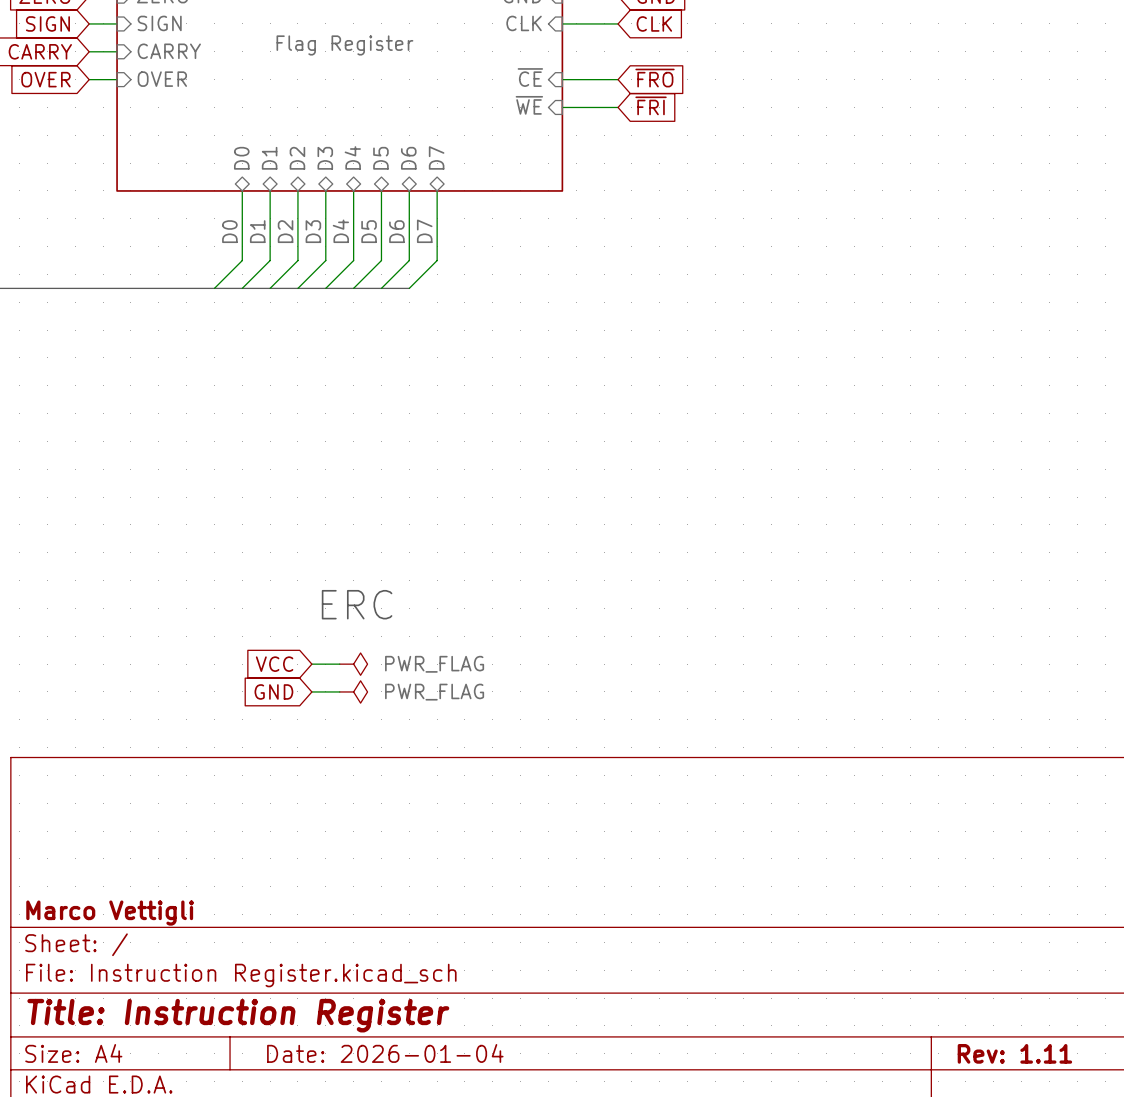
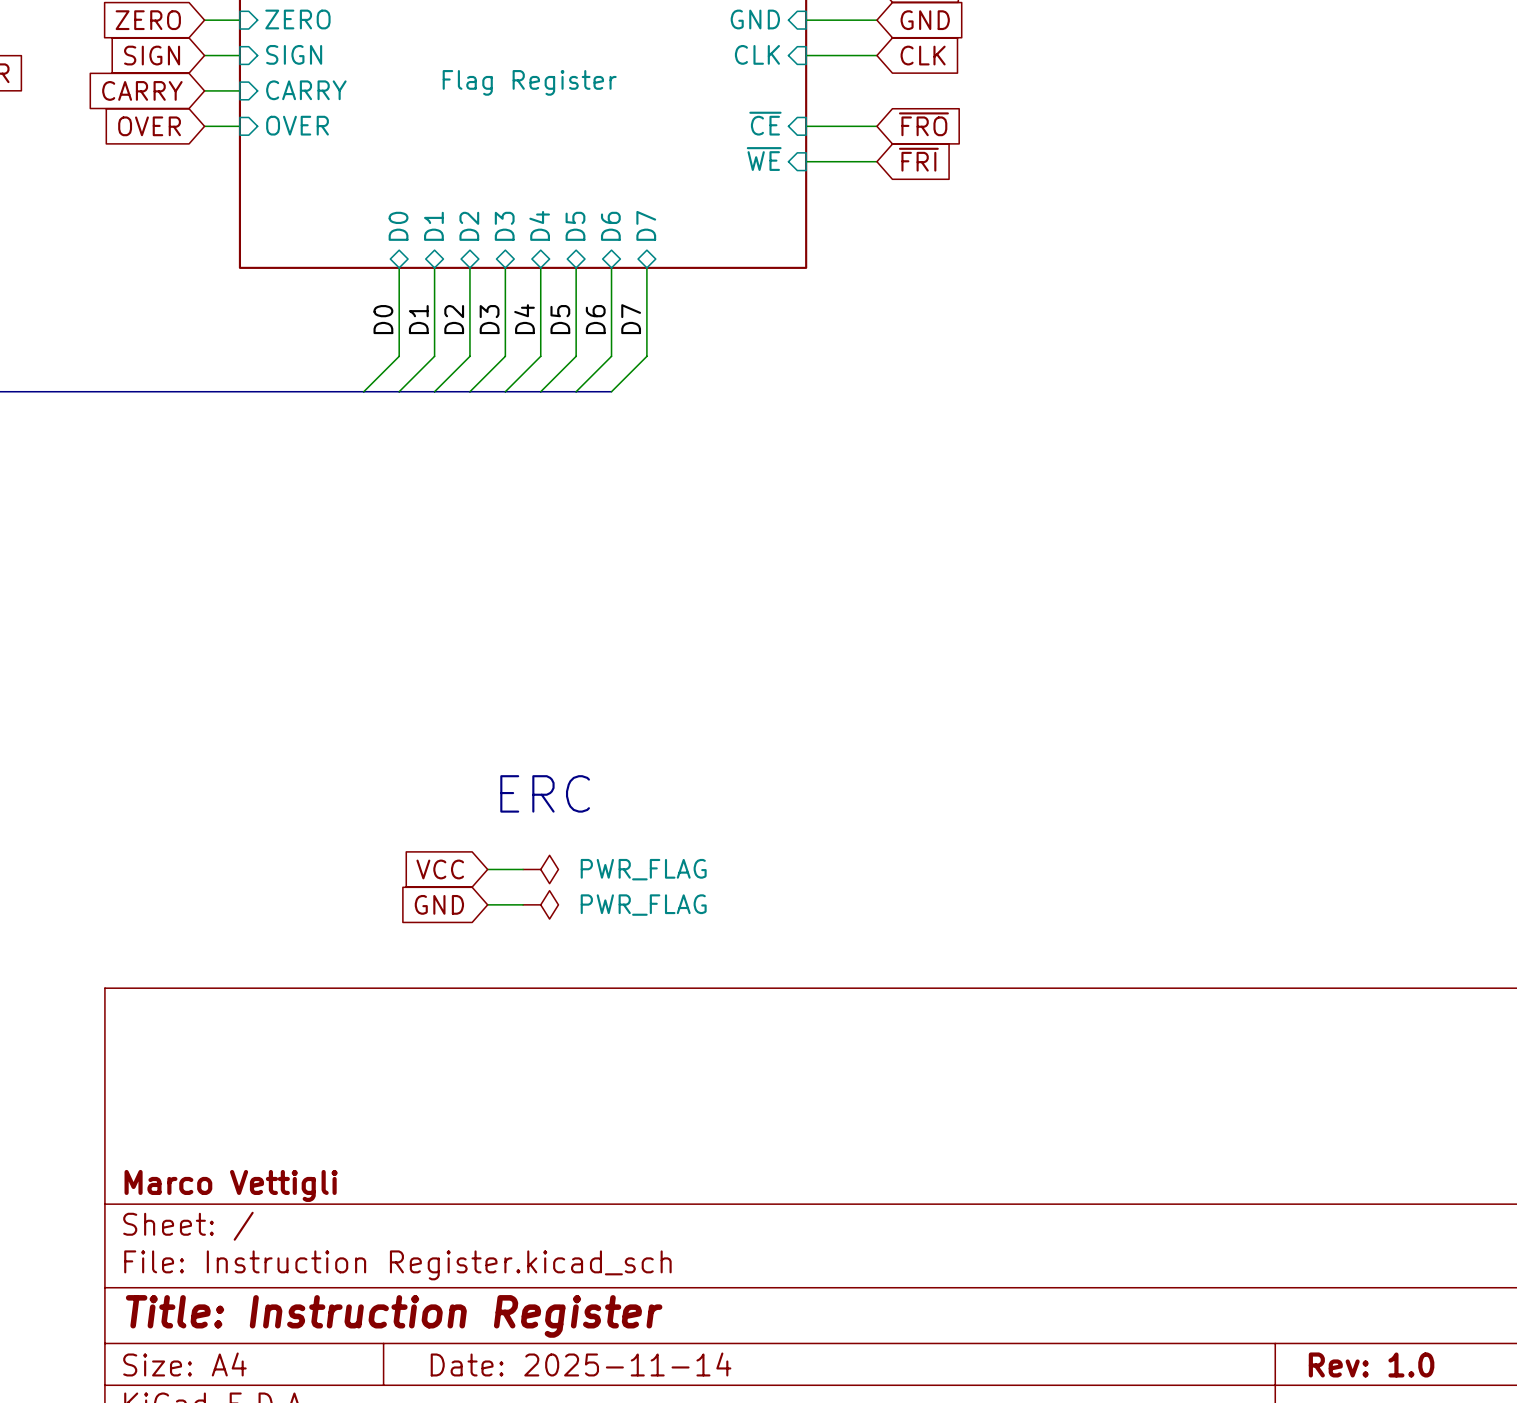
title block: Date: 2026-01-04 (385, 1053) -> Date: 2025-11-14 (581, 1364)
title block: Rev: 1.11 (1014, 1053) -> Rev: 1.0 (1371, 1364)

